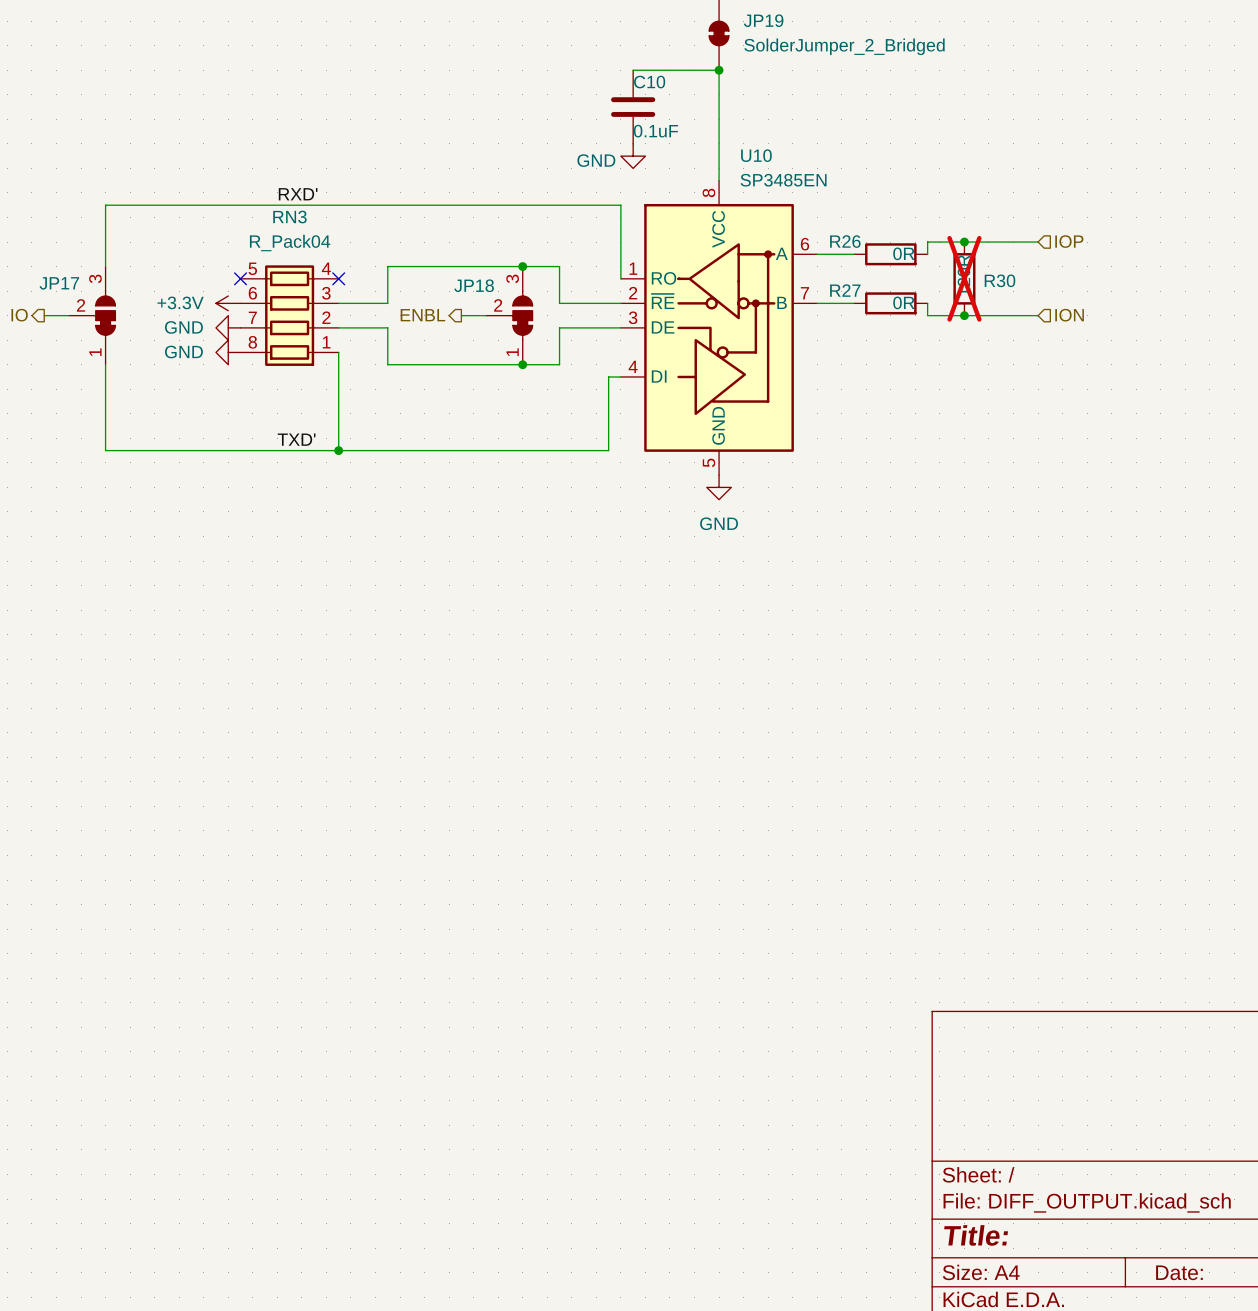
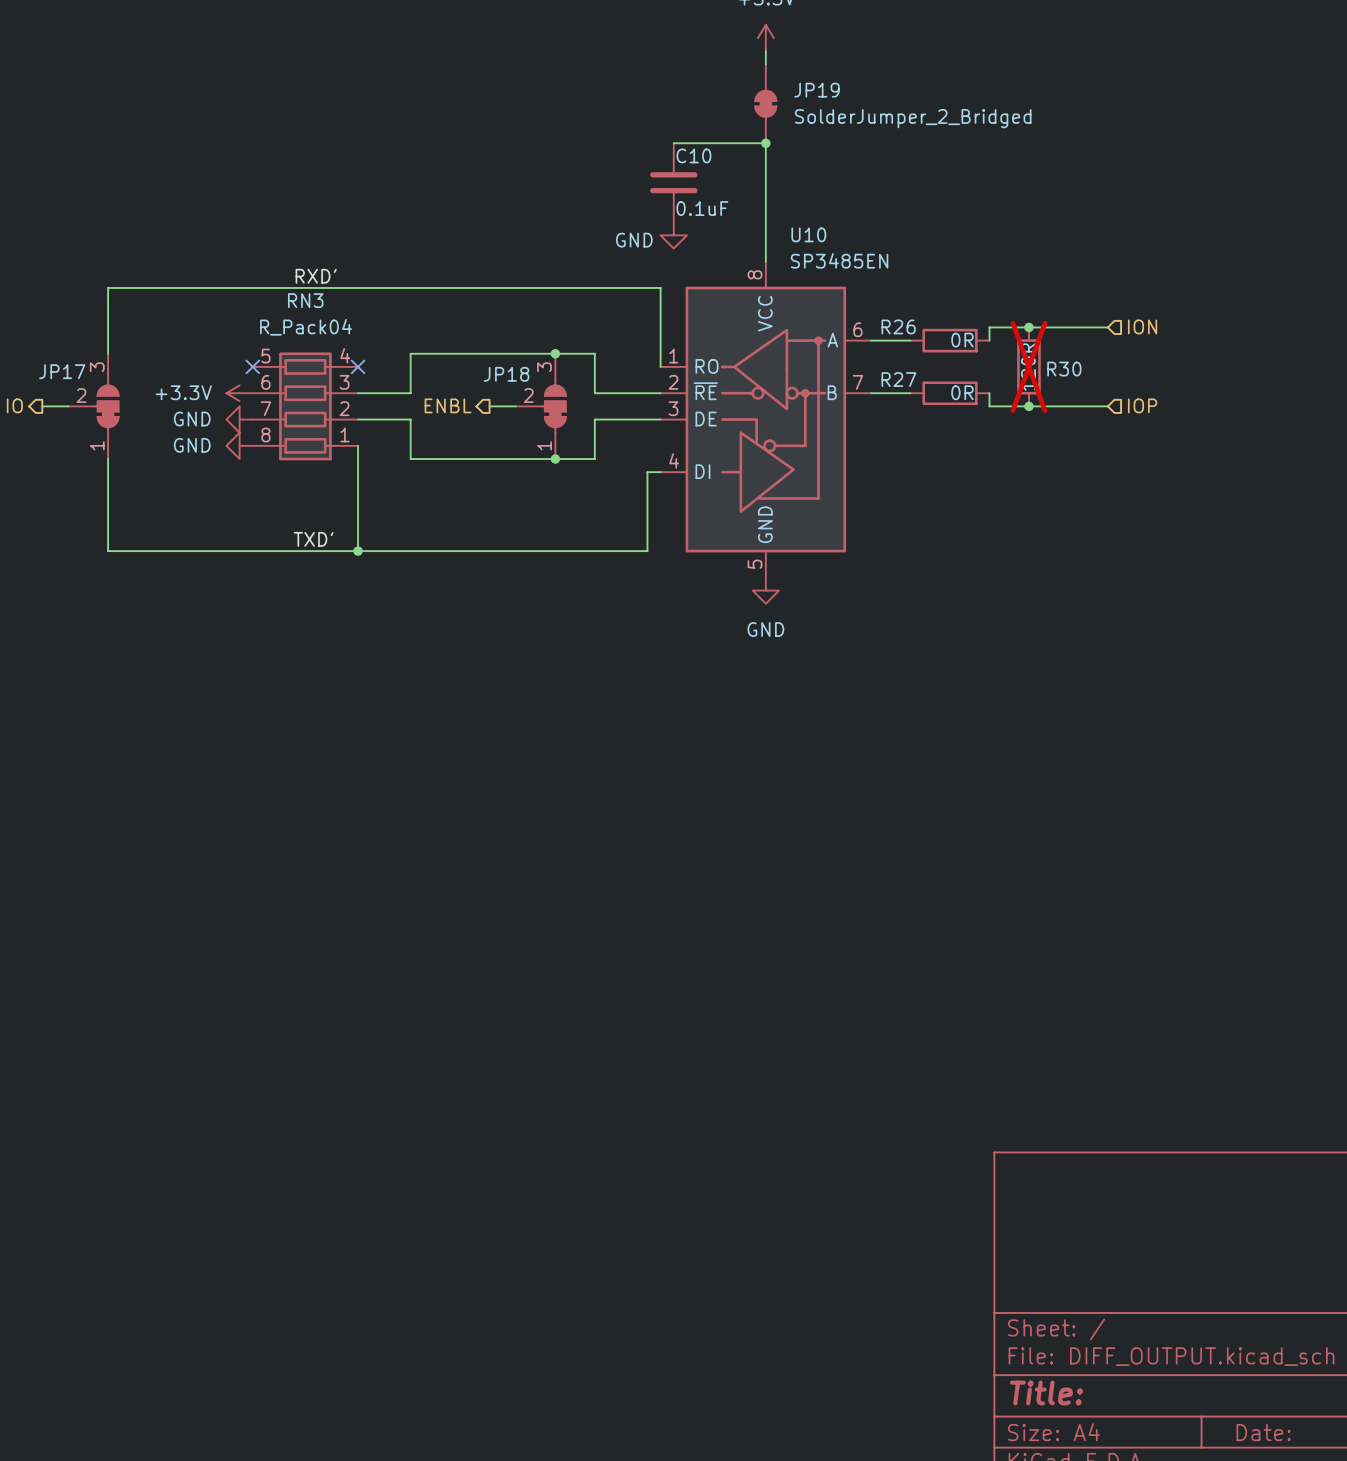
hierarchical label: IOP (1069, 241) -> ION (1142, 326)
hierarchical label: ION (1069, 315) -> IOP (1142, 405)

